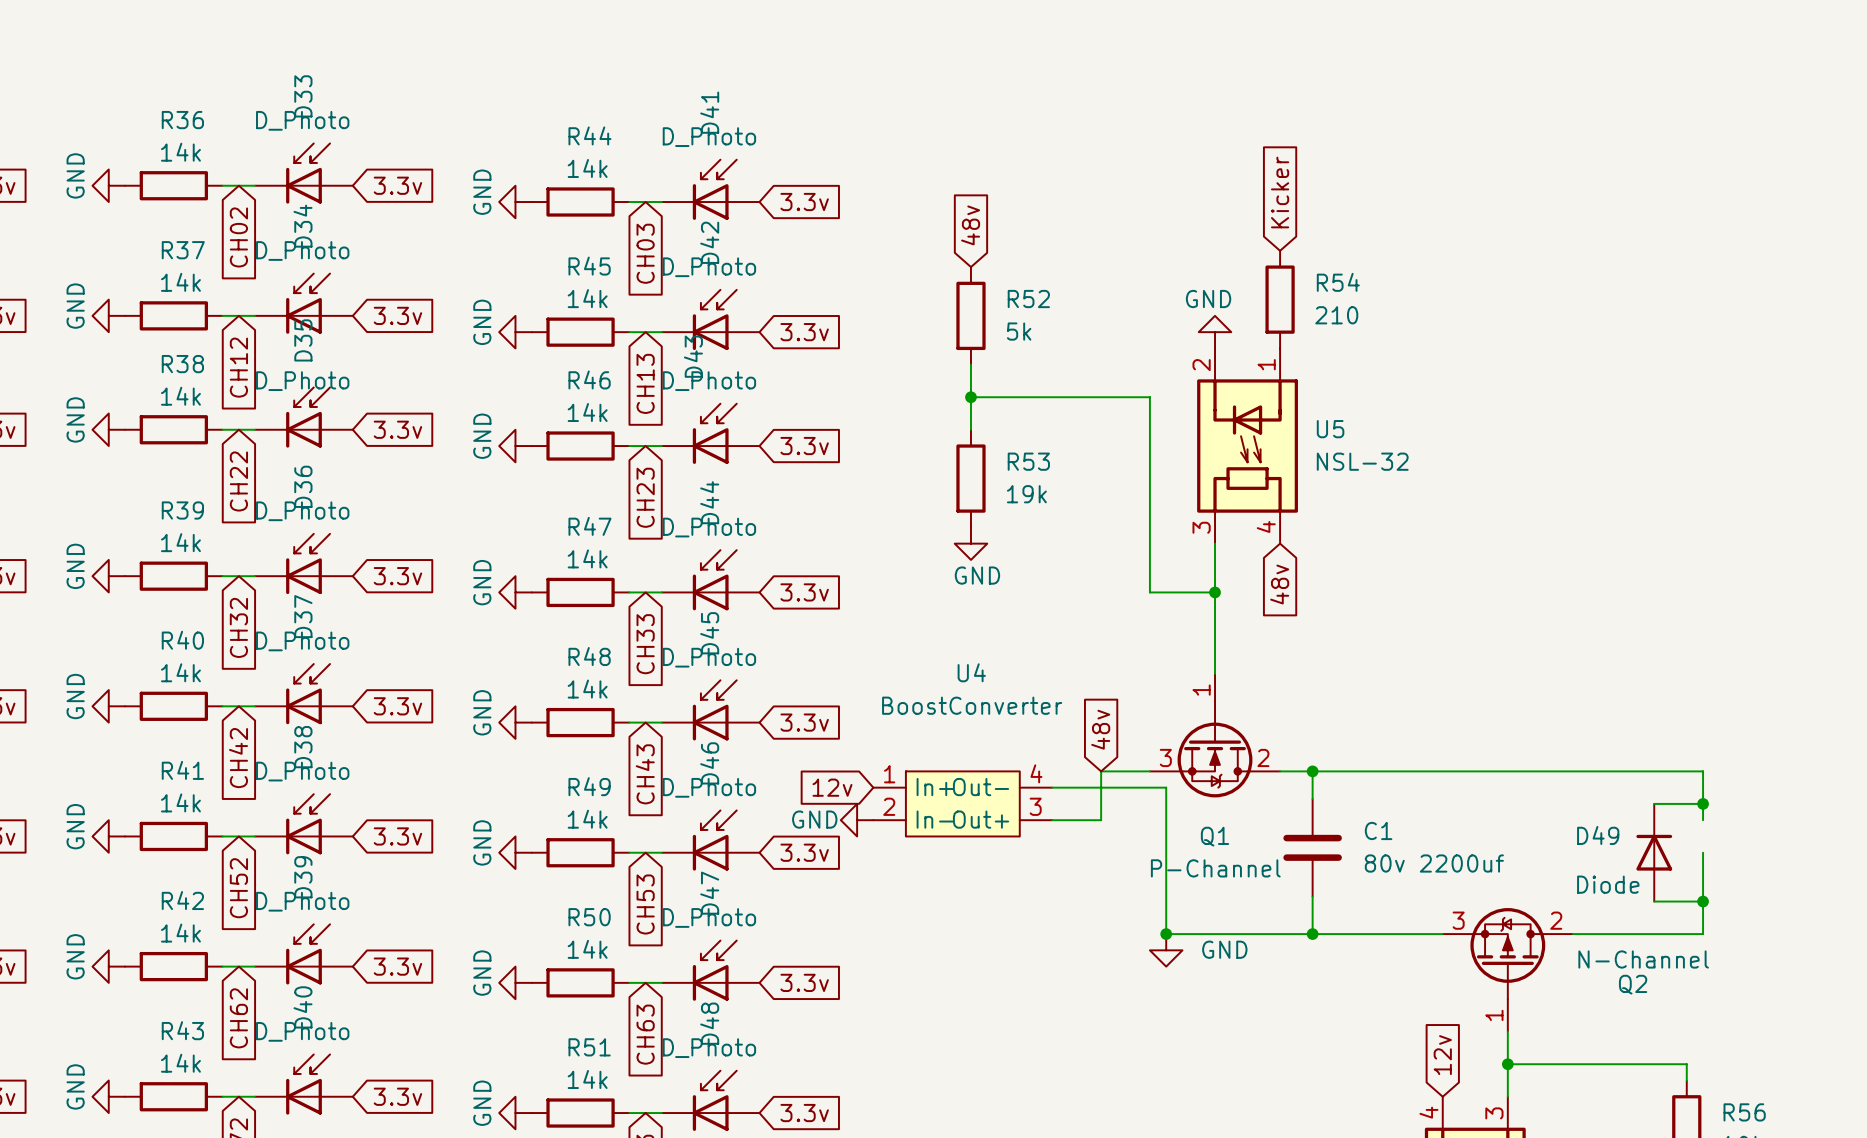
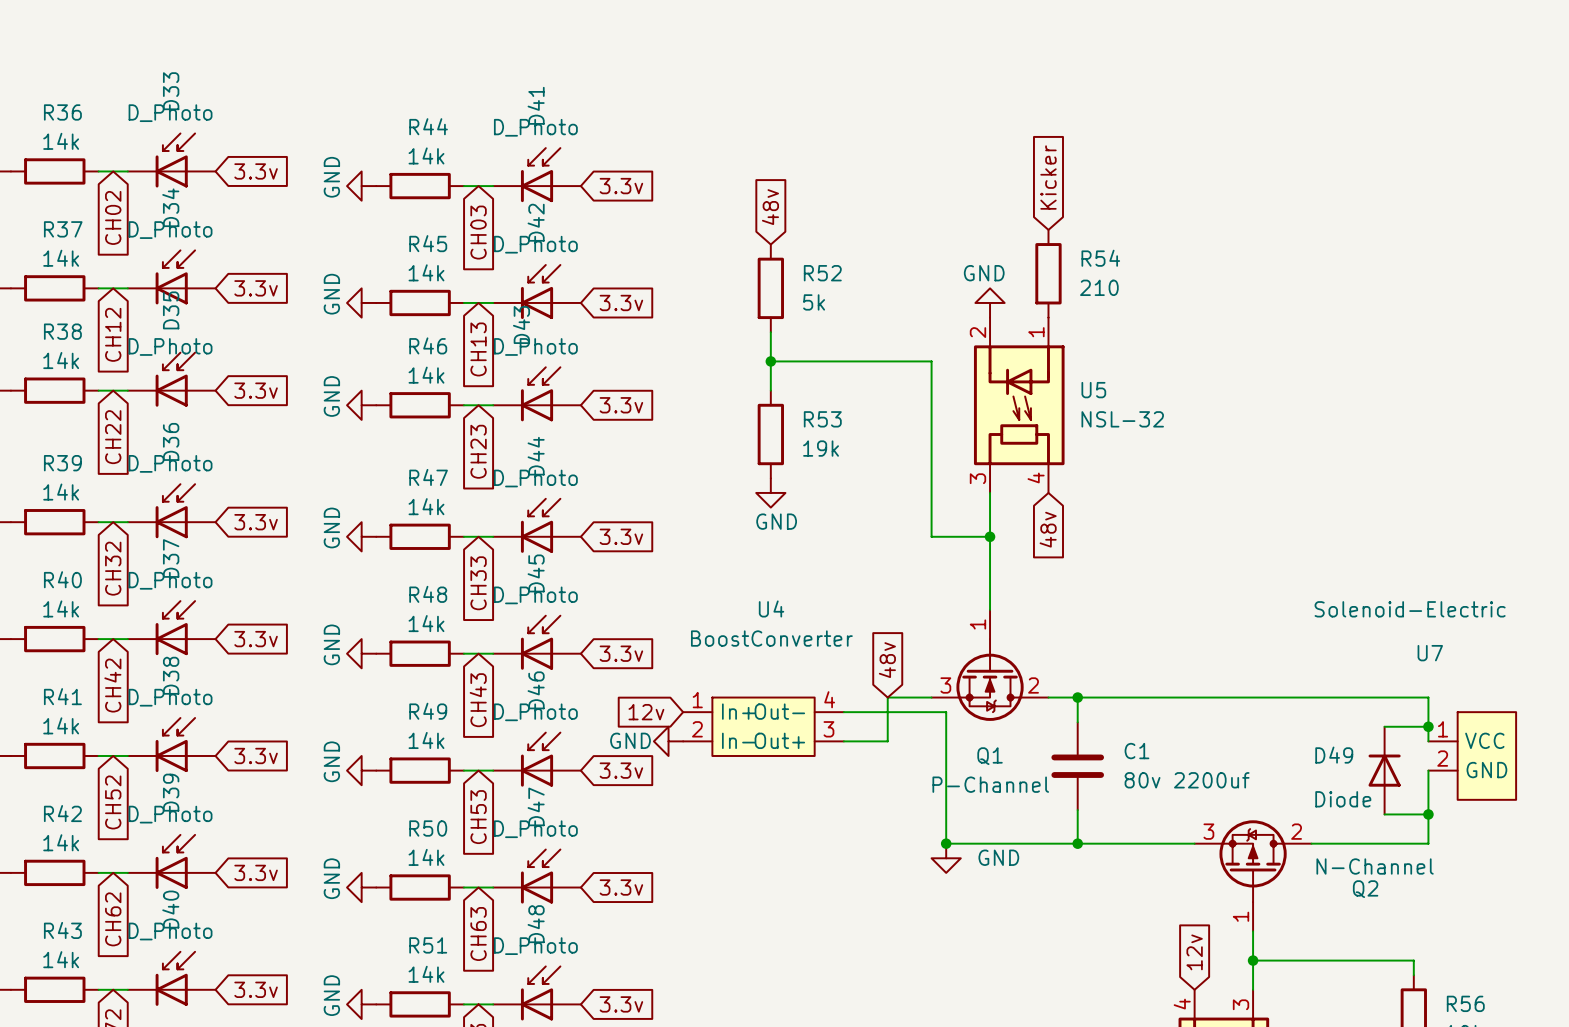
U7: none -> Solenoid-Electric (1472, 755)

